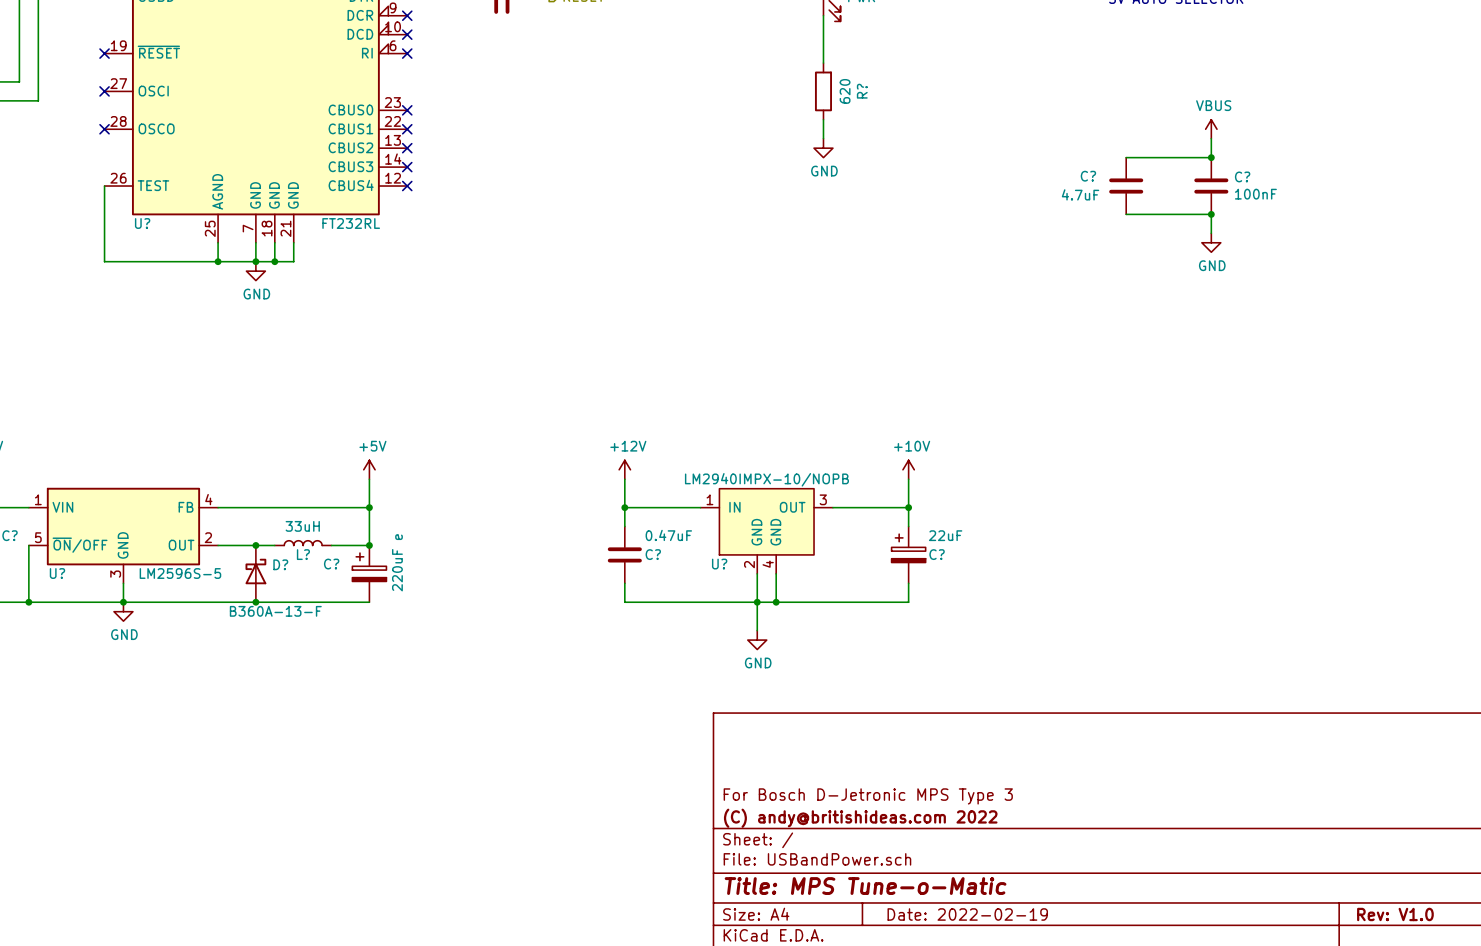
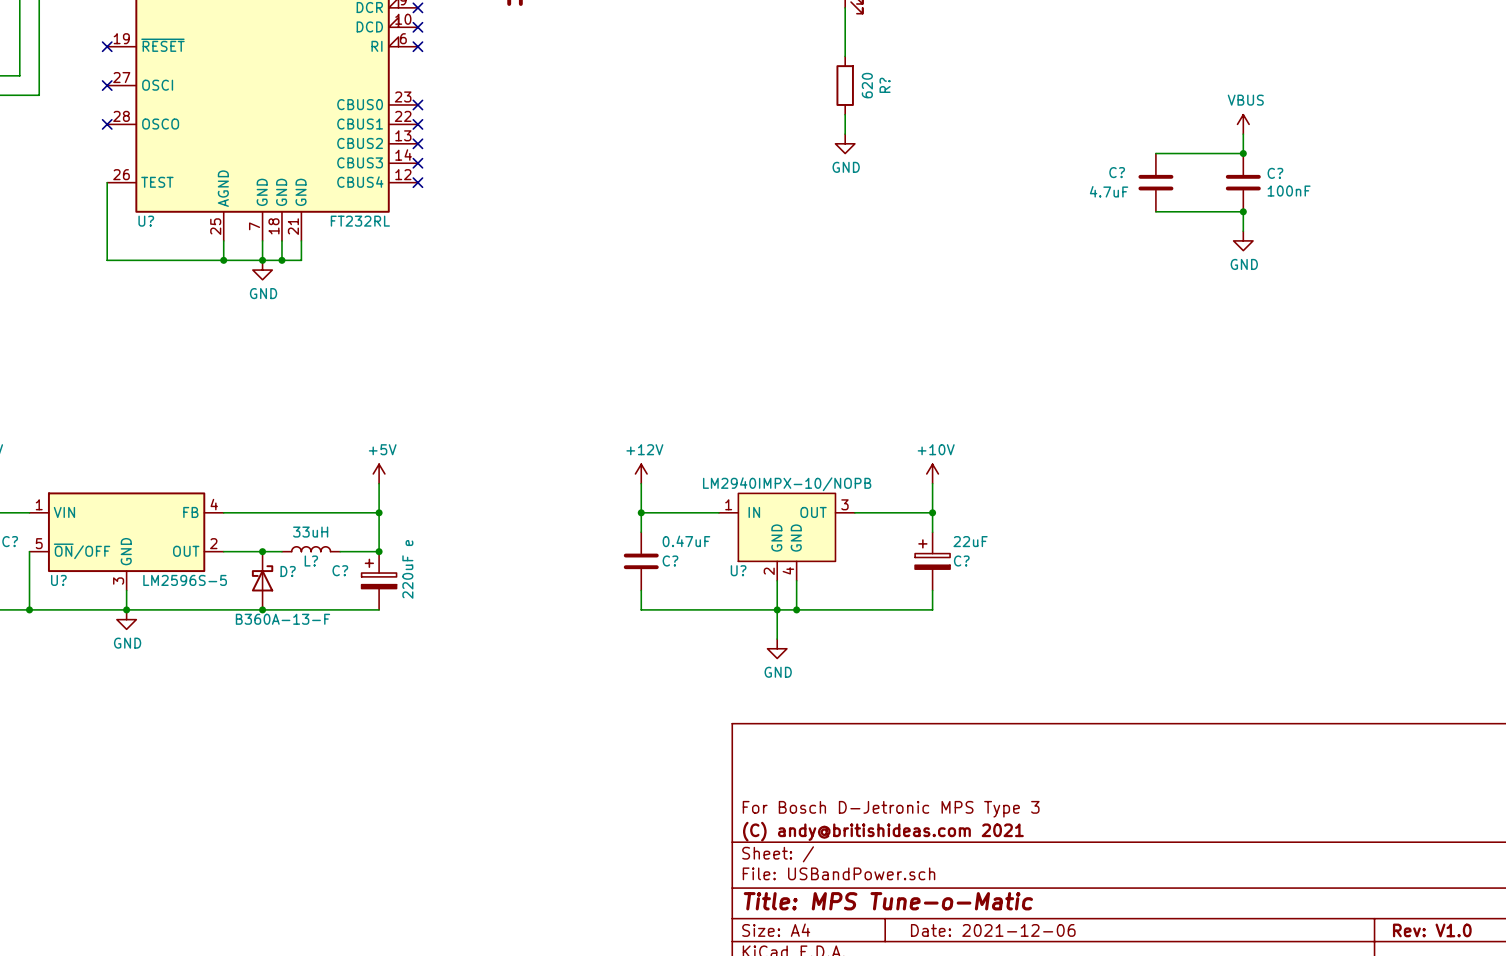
title block: (C) andy@britishideas.com 2022 (860, 818) -> (C) andy@britishideas.com 2021 (883, 831)
title block: Date: 2022-02-19 (967, 914) -> Date: 2021-12-06 (993, 930)

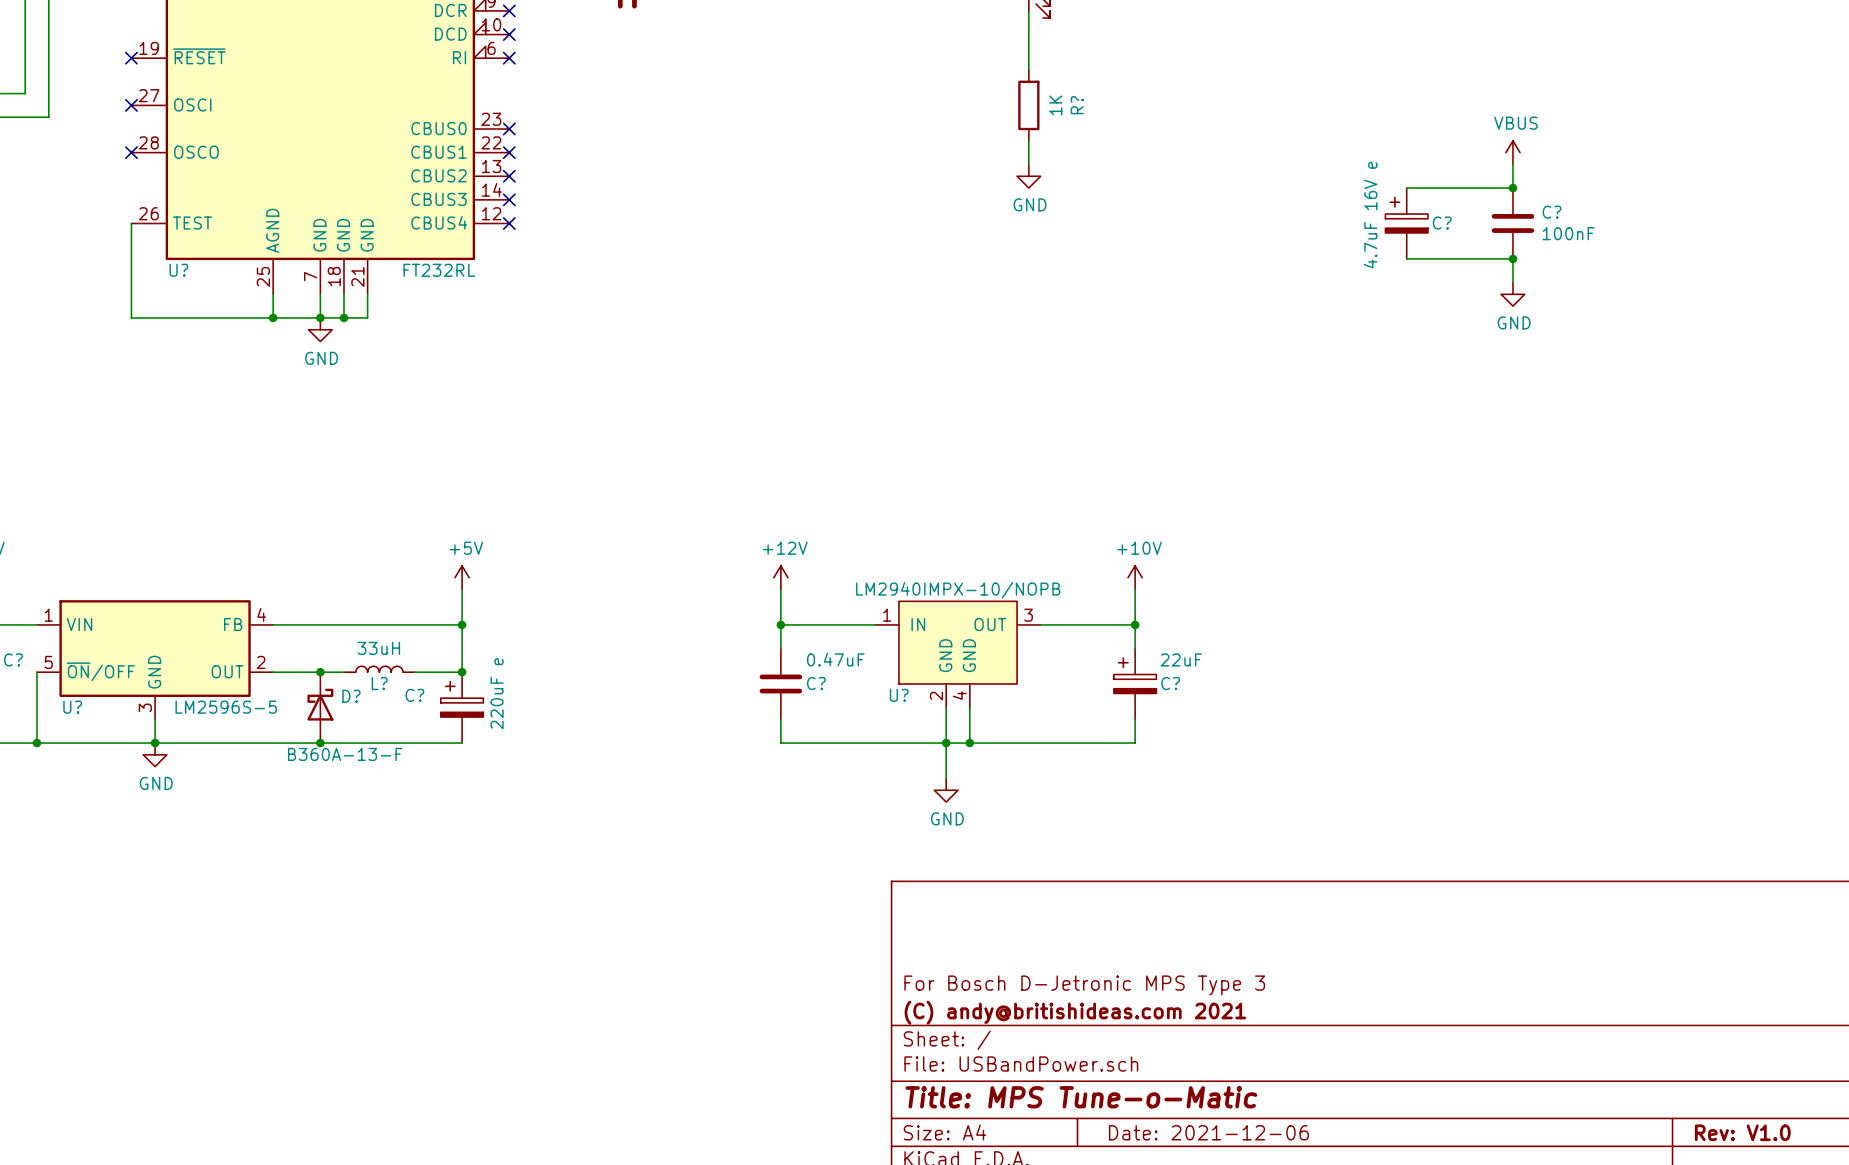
R? value: 620 (867, 85) -> 1K (1055, 105)
C? symbol: [1138, 153, 1174, 212] -> [1385, 188, 1428, 259]
C? name position: C? (1117, 172) -> C? (1442, 223)
C? value: 4.7uF (1109, 191) -> 4.7uF 16V e (1370, 214)

